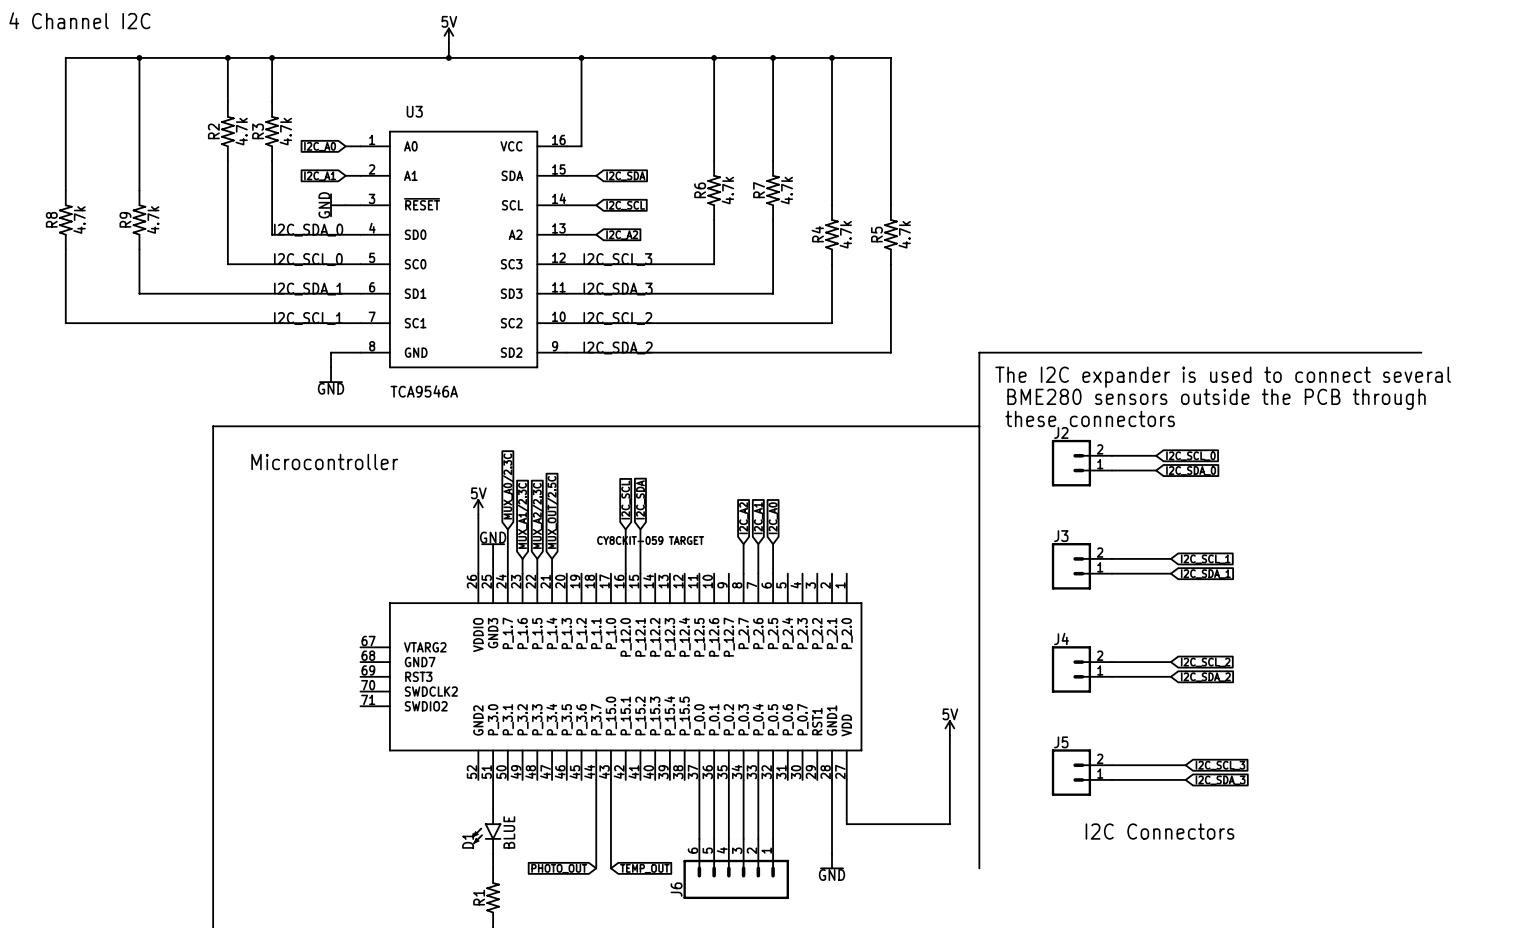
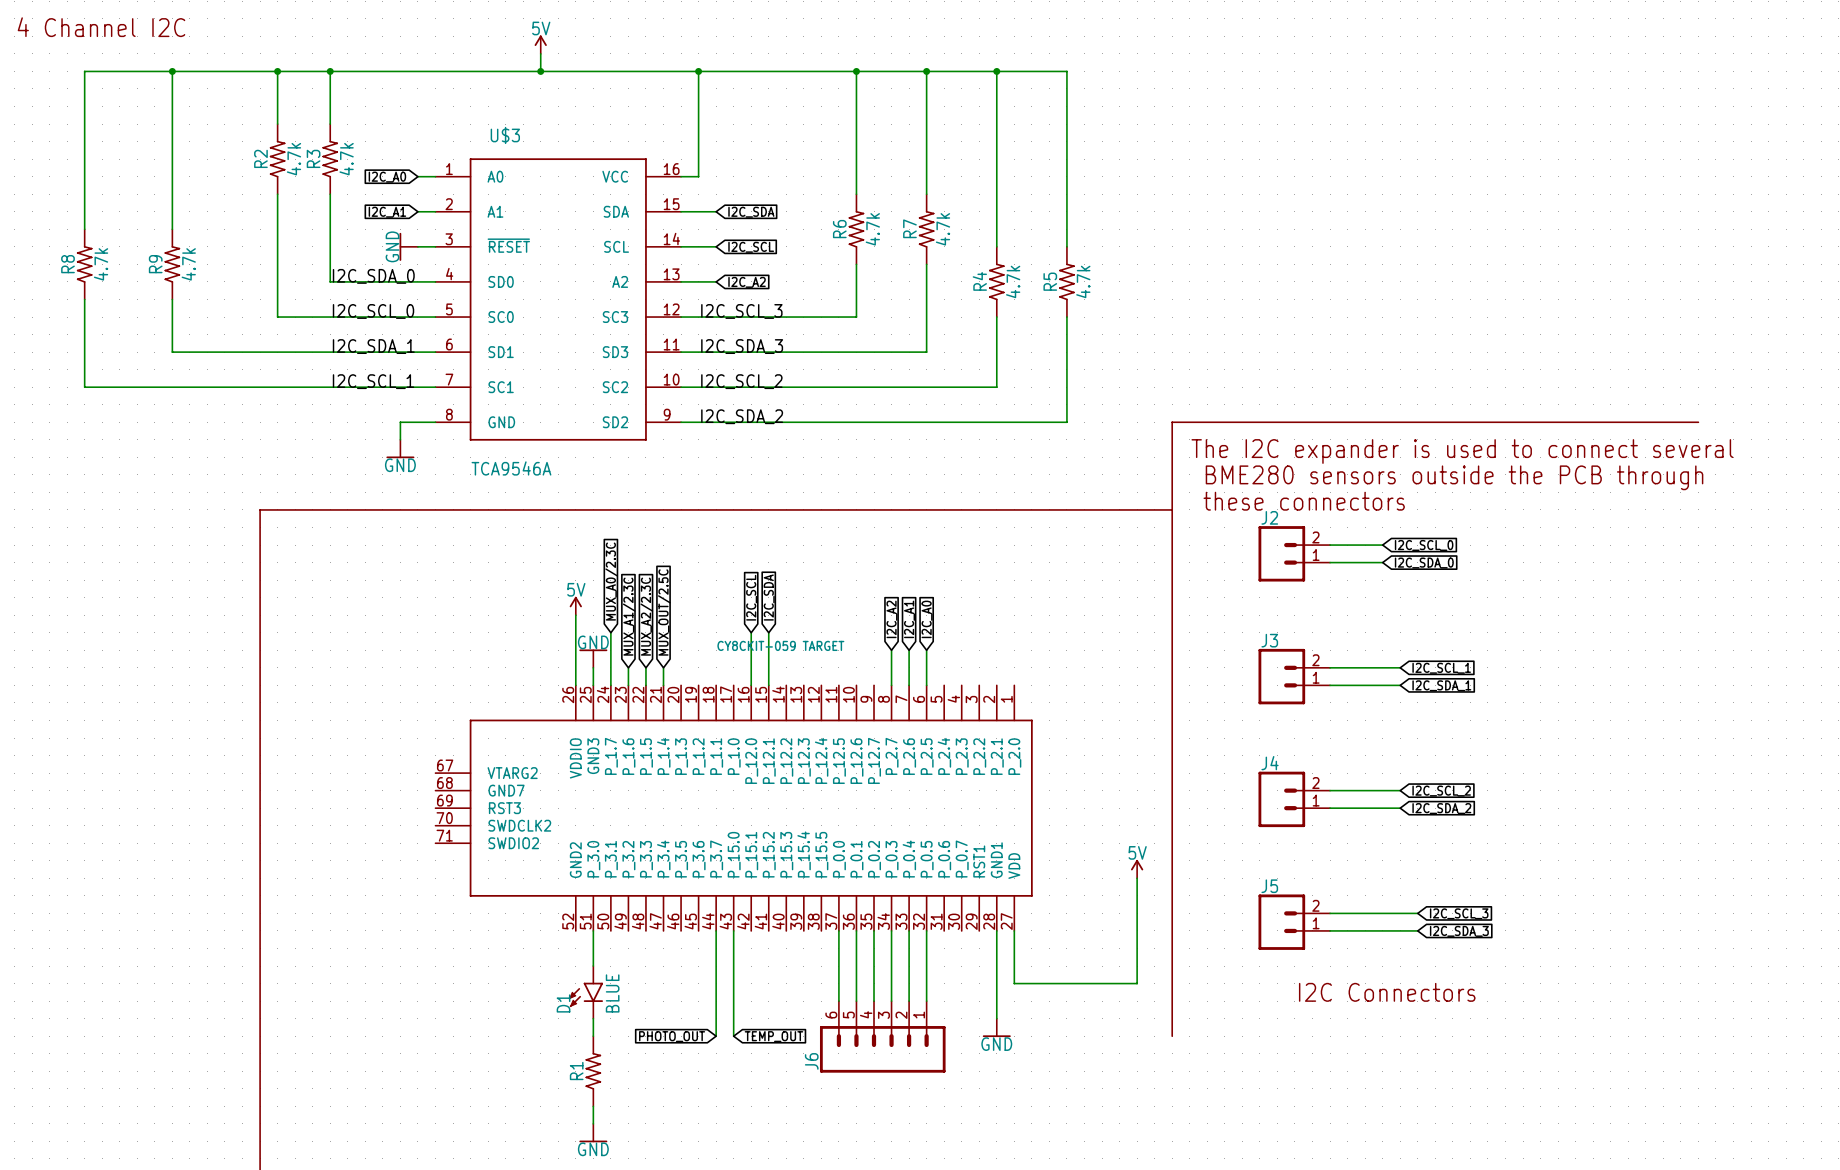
U3 name: U3 (414, 111) -> U$3 (505, 135)
text: Microcontroller (324, 461) -> none

